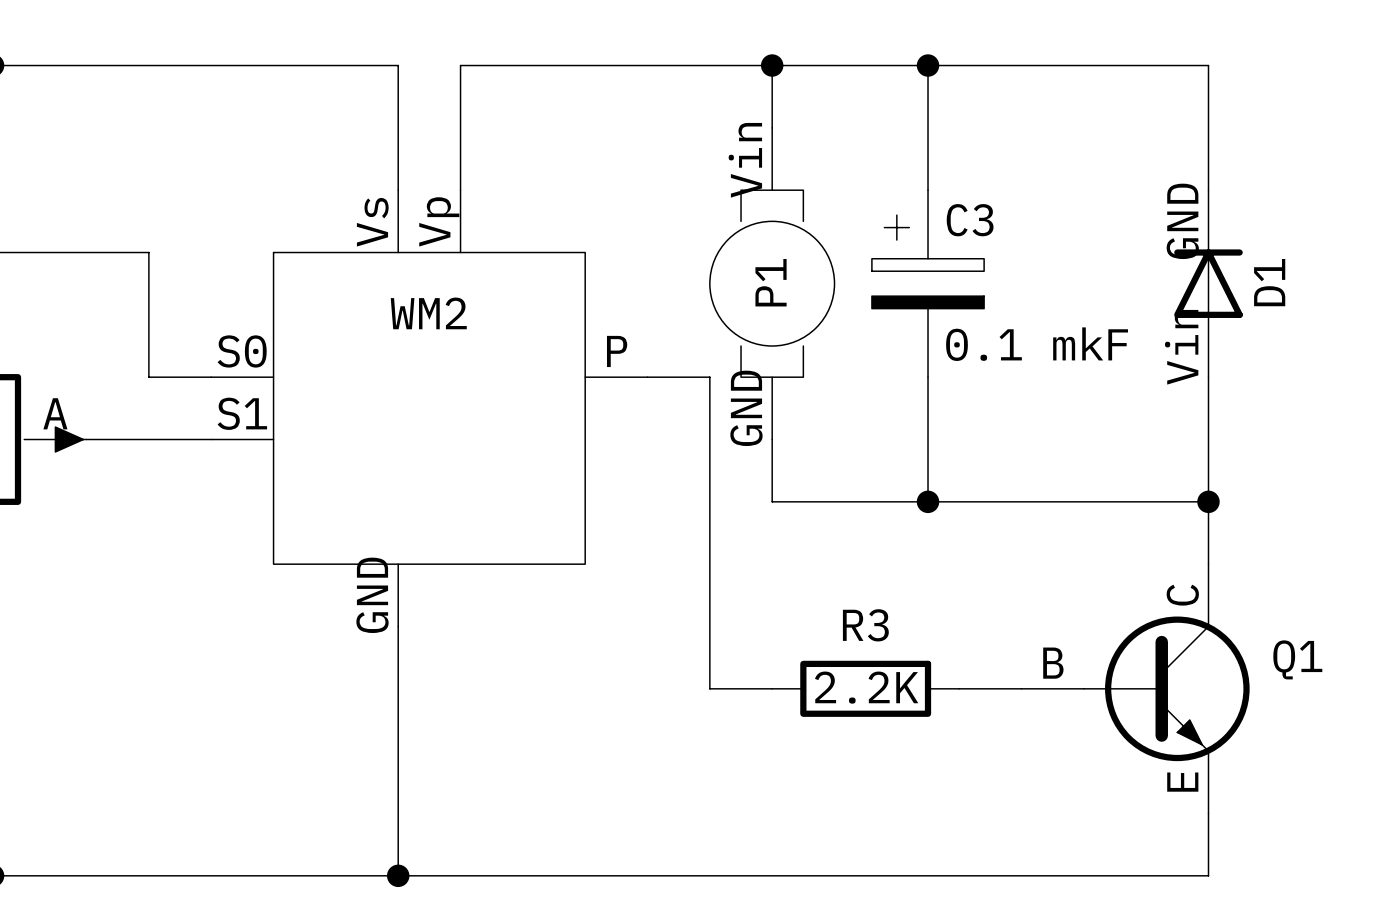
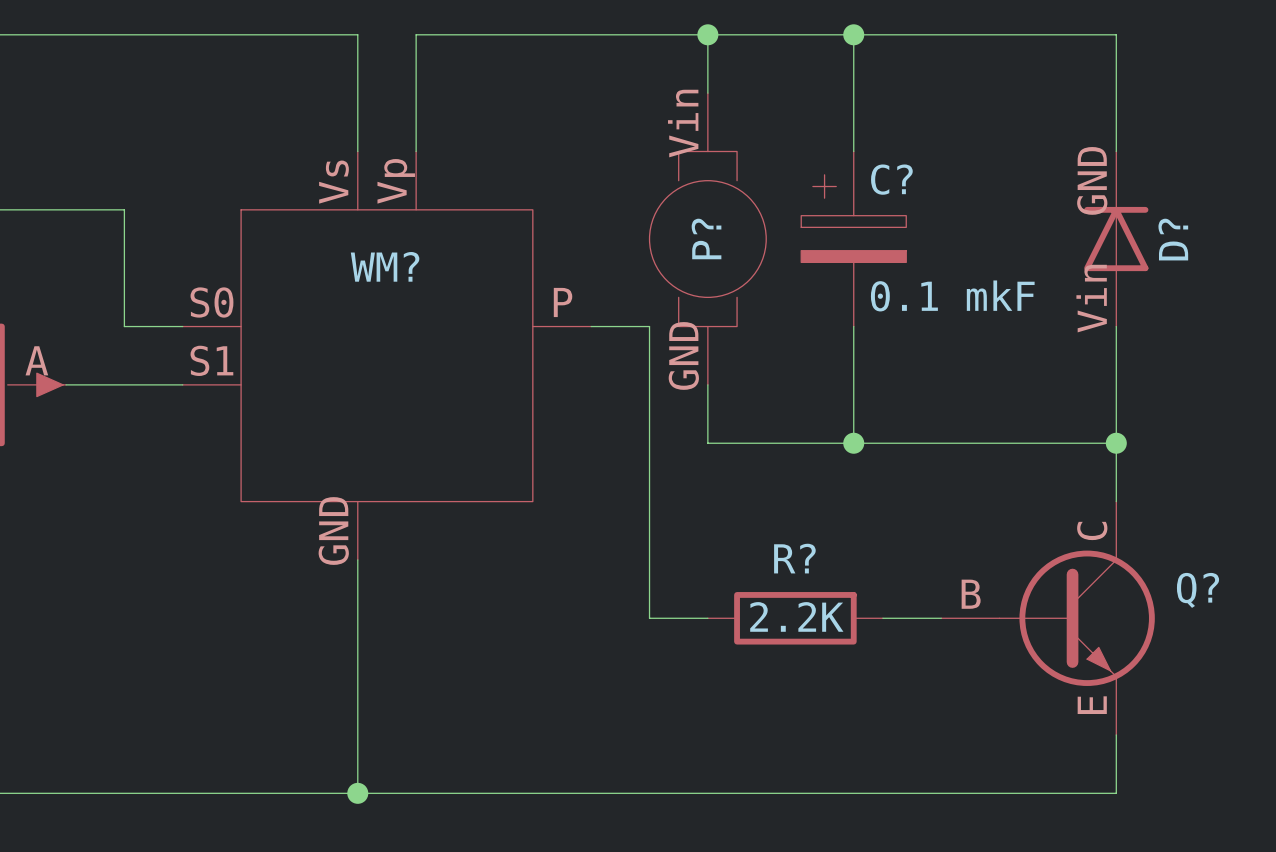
C3 name: C3 (970, 220) -> C? (891, 179)
P1 name: P1 (771, 282) -> P? (706, 238)
D1 name: D1 (1269, 282) -> D? (1173, 239)
WM2 name: WM2 (428, 313) -> WM? (385, 266)
R3 name: R3 (865, 625) -> R? (794, 558)
Q1 name: Q1 (1297, 659) -> Q? (1198, 590)

